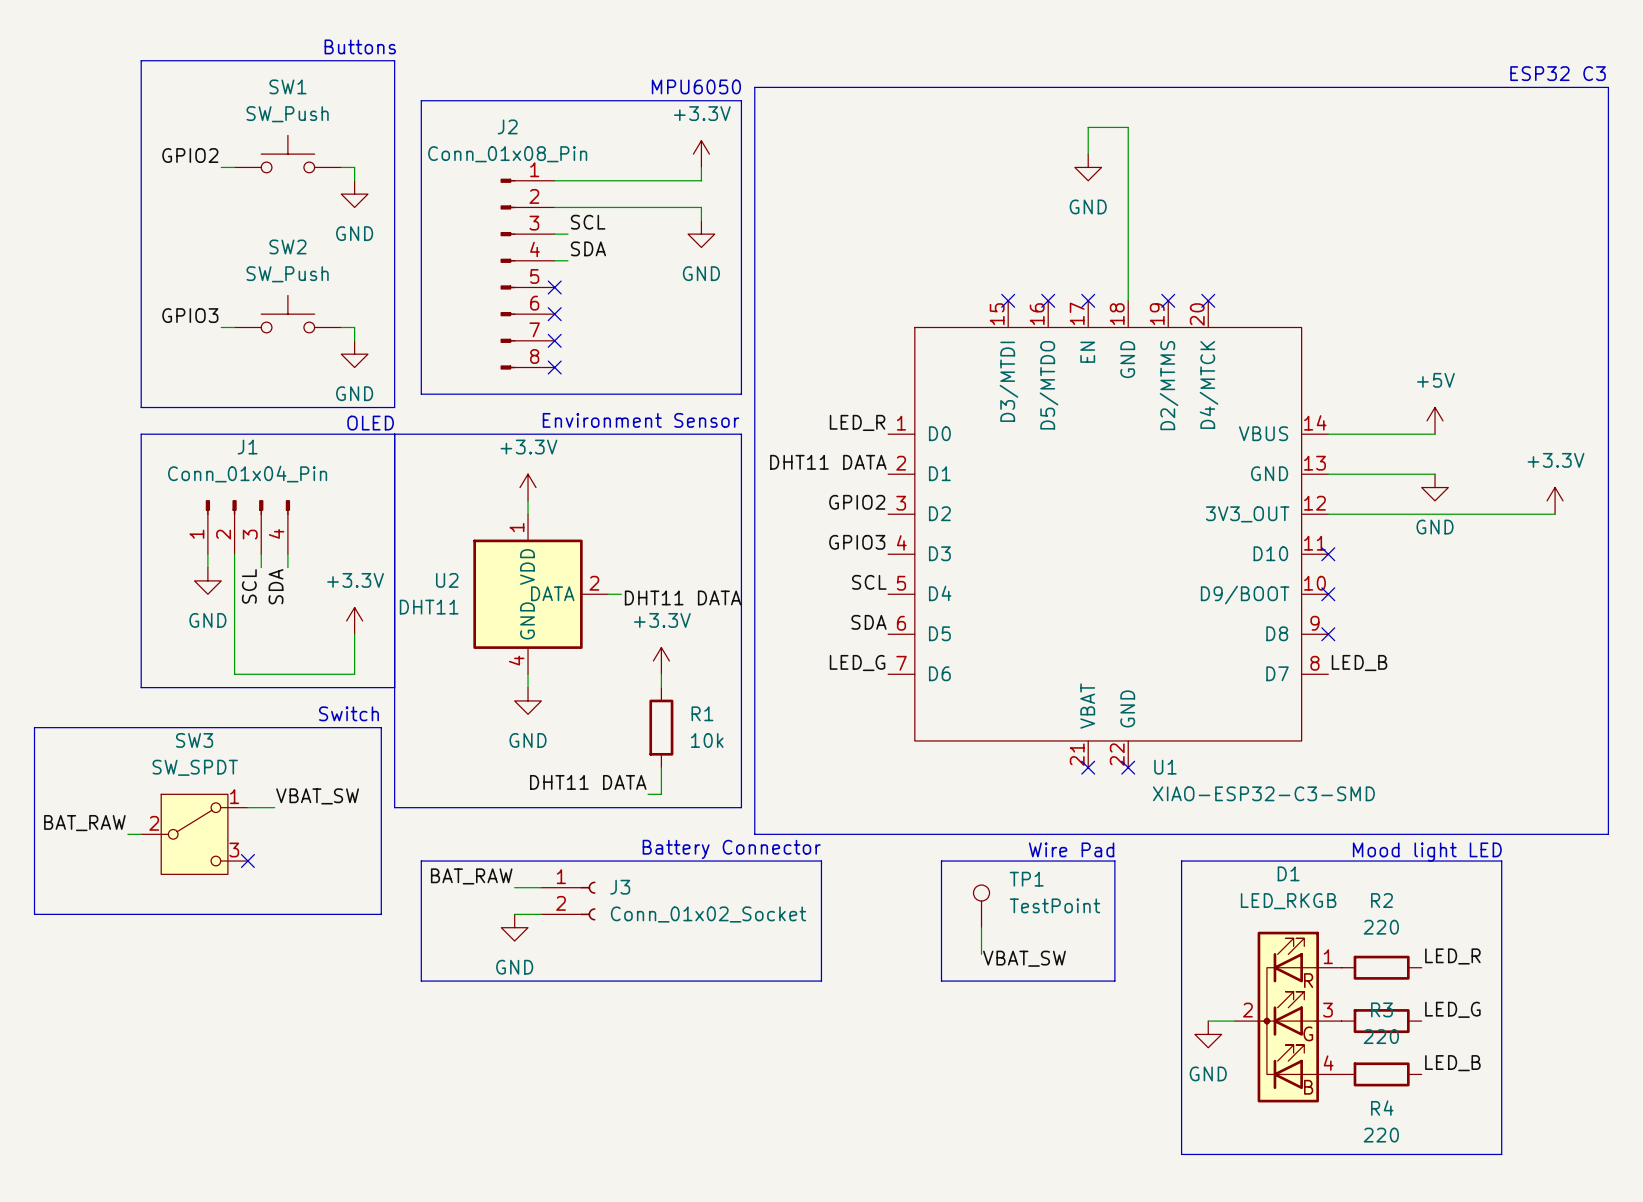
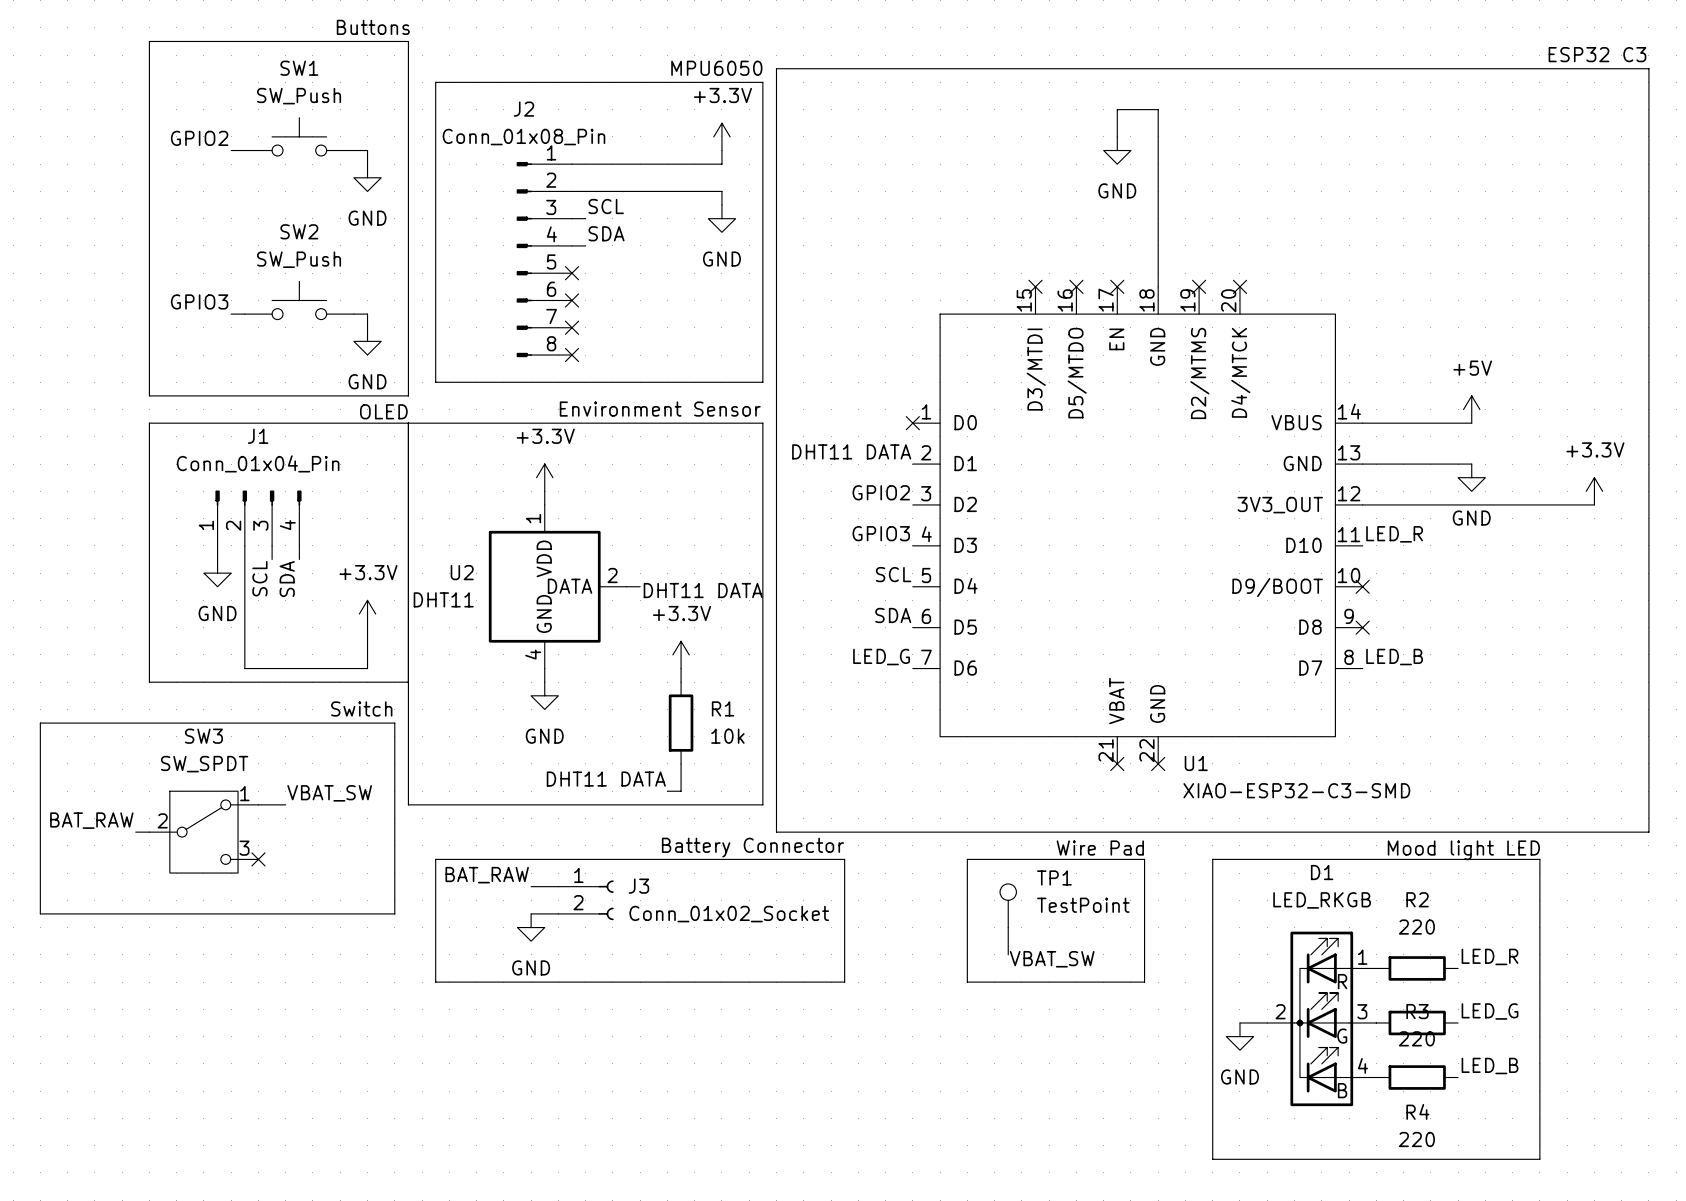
label: LED_R (857, 422) -> none
no-connect mark: none -> (912, 423)
label: none -> LED_R (1394, 534)
no-connect mark: (1328, 554) -> none

